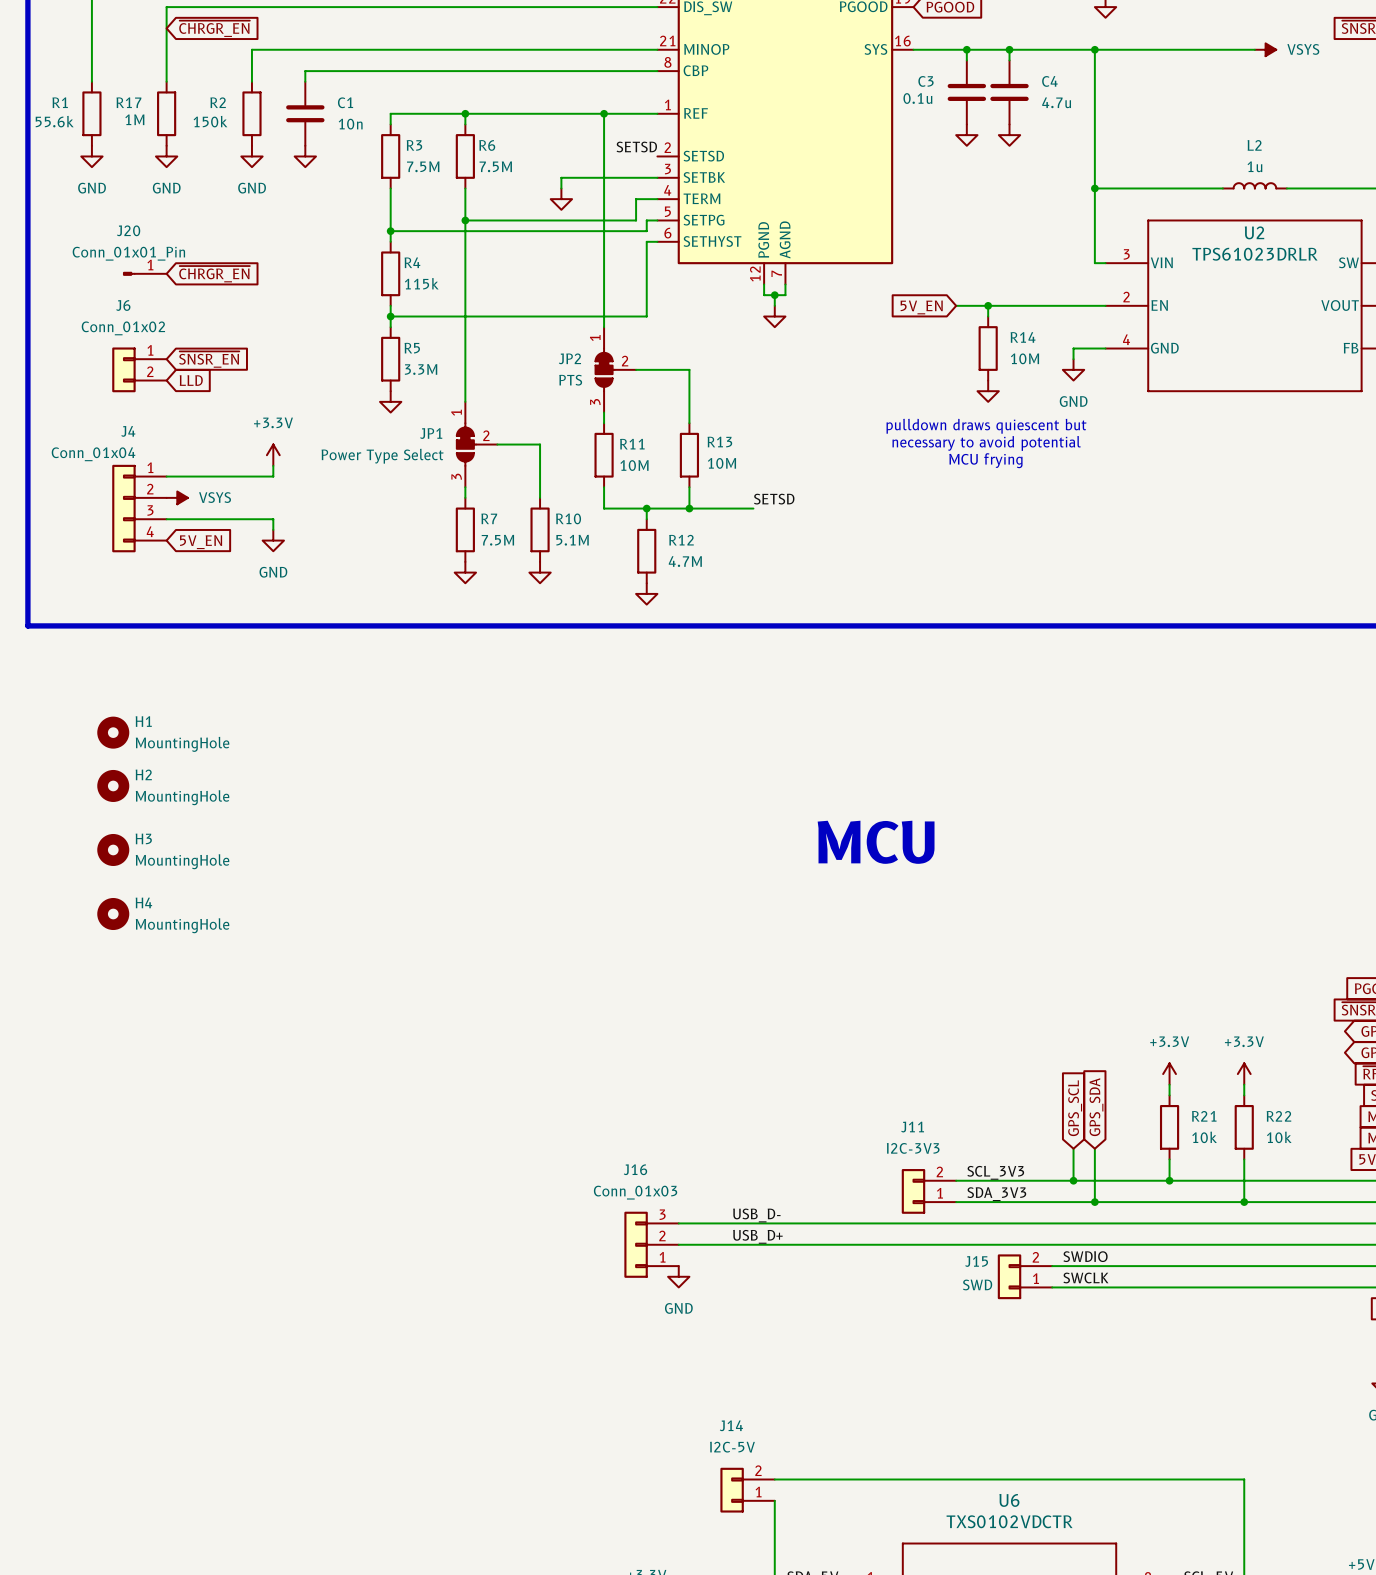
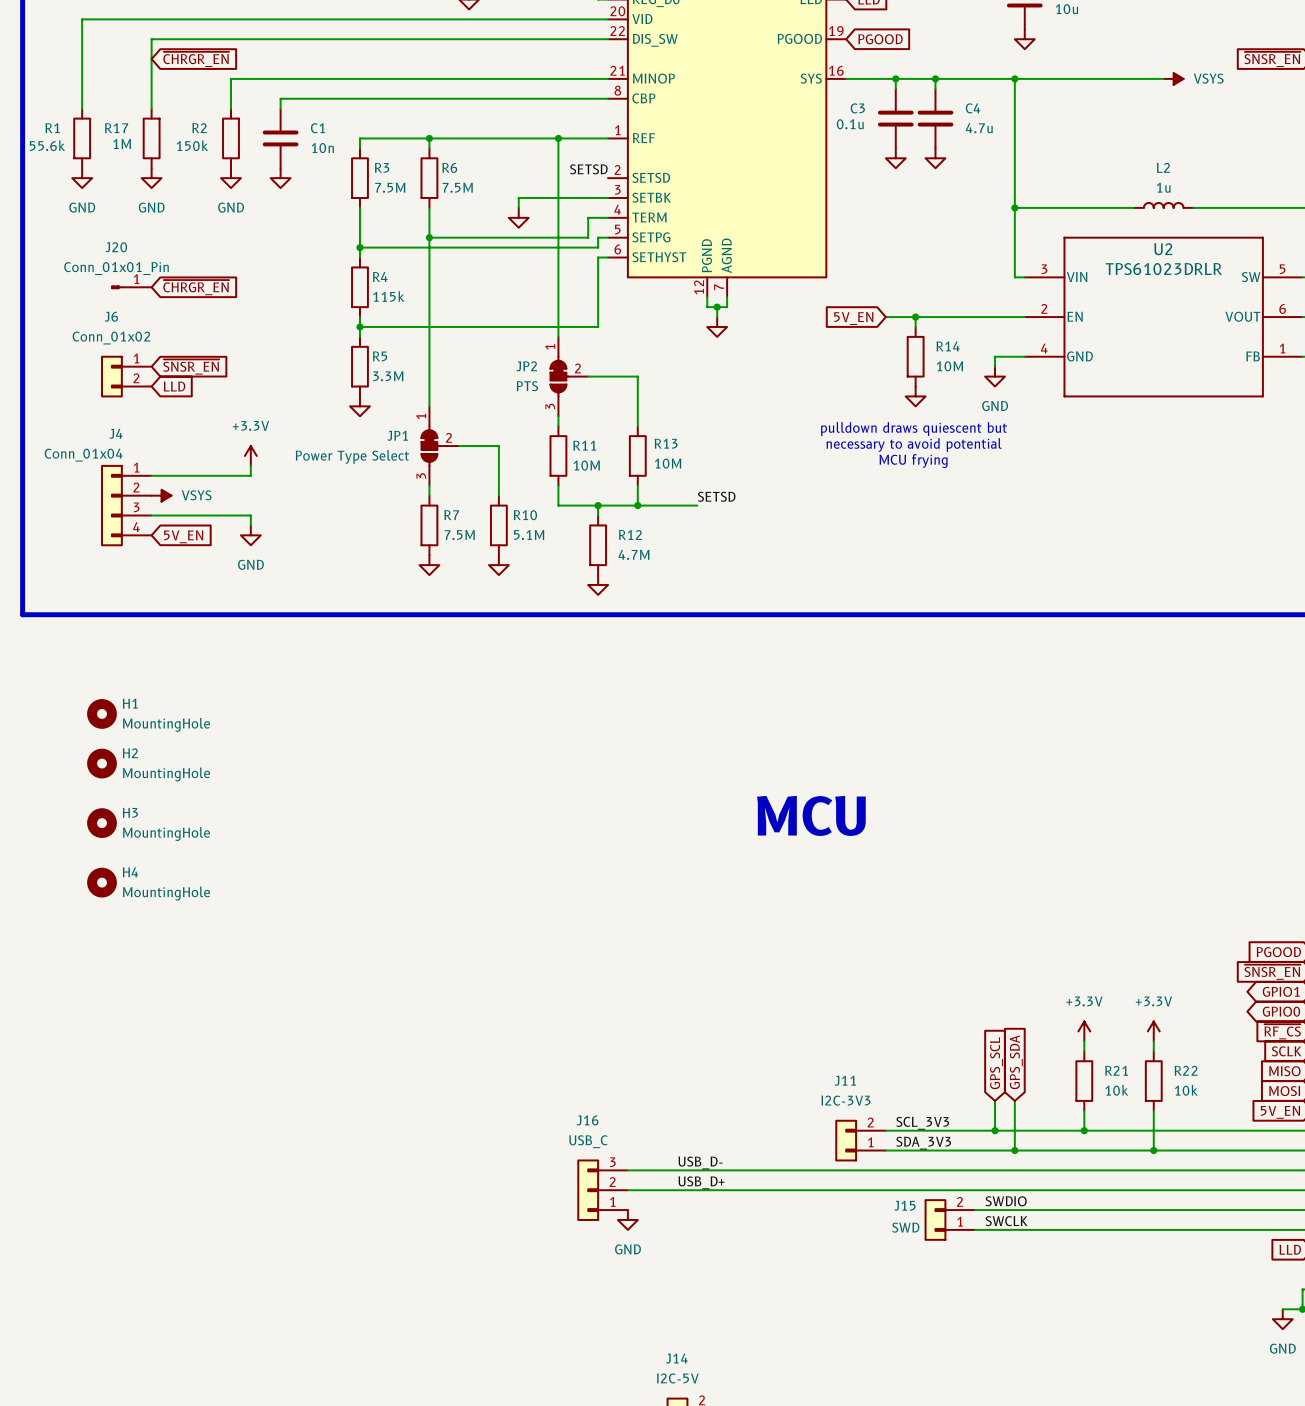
J16 value: Conn_01x03 (635, 1192) -> USB_C (588, 1141)

